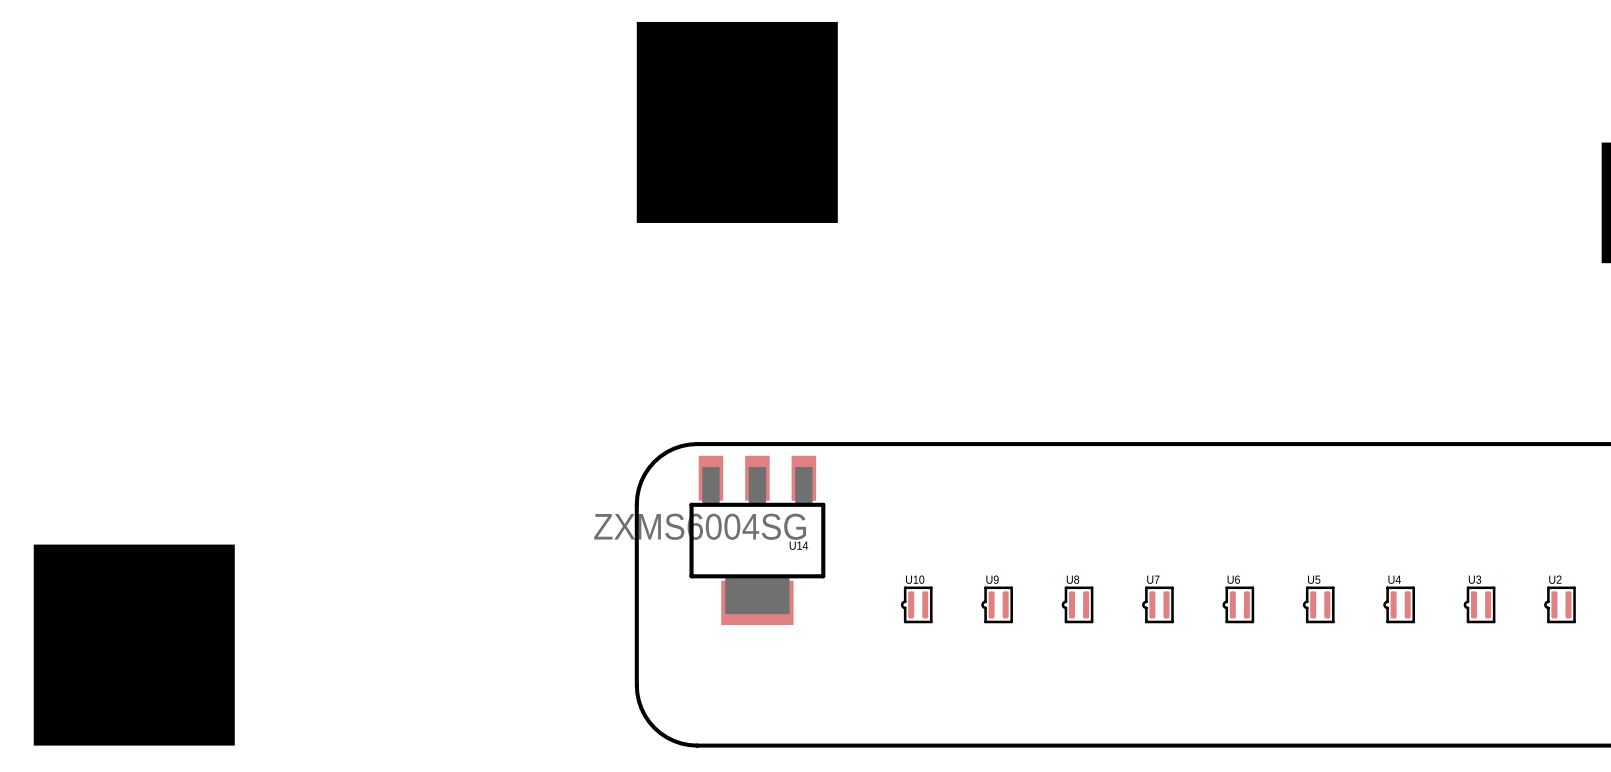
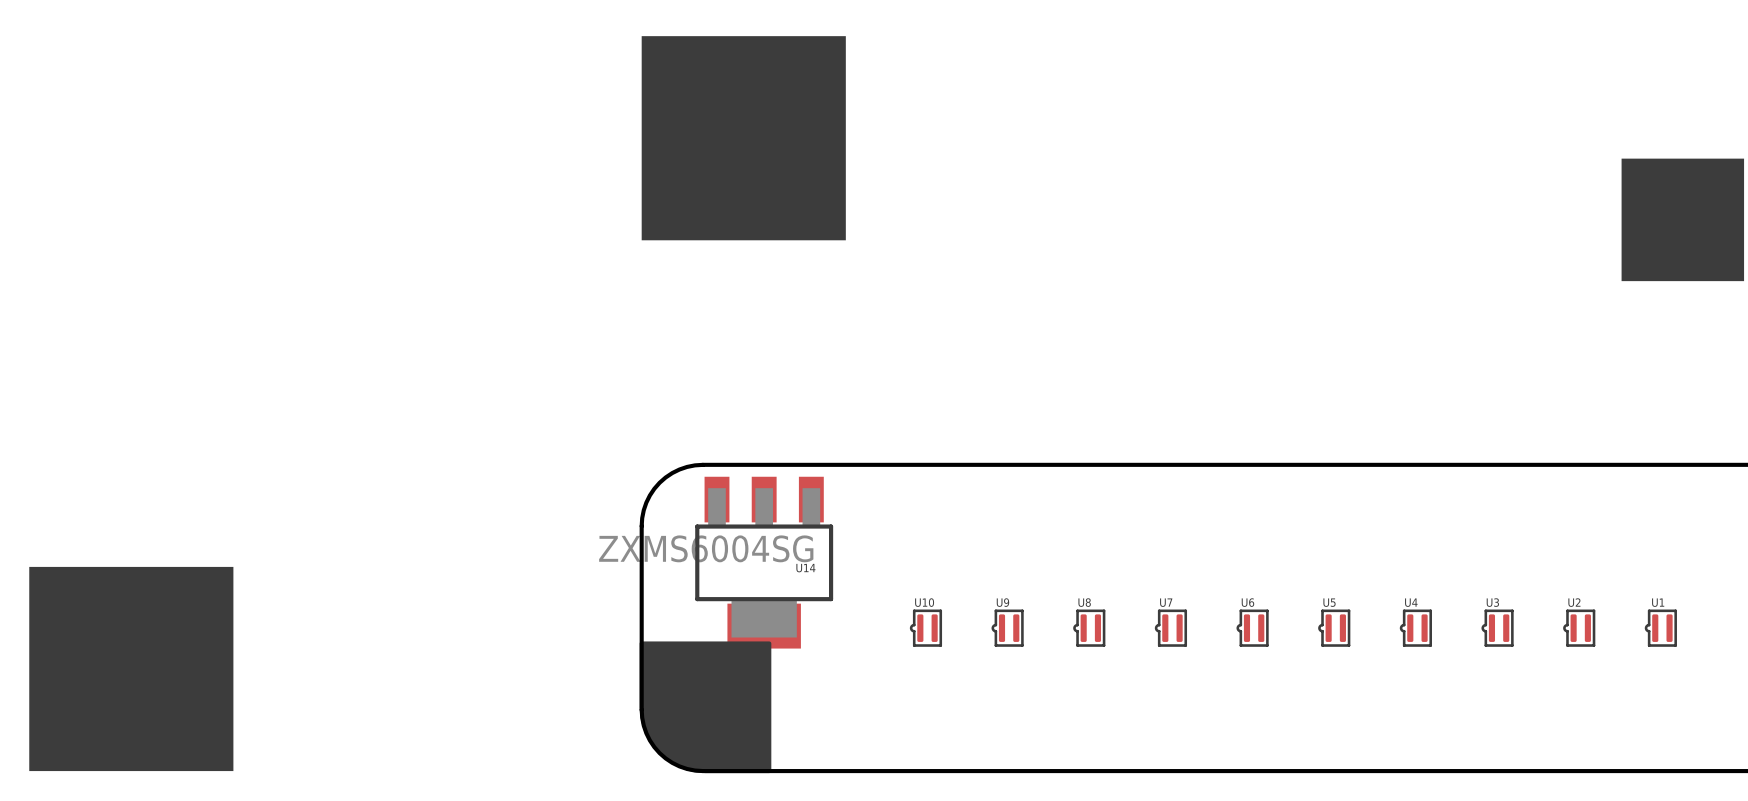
drawing: none -> [639, 641, 772, 774]

